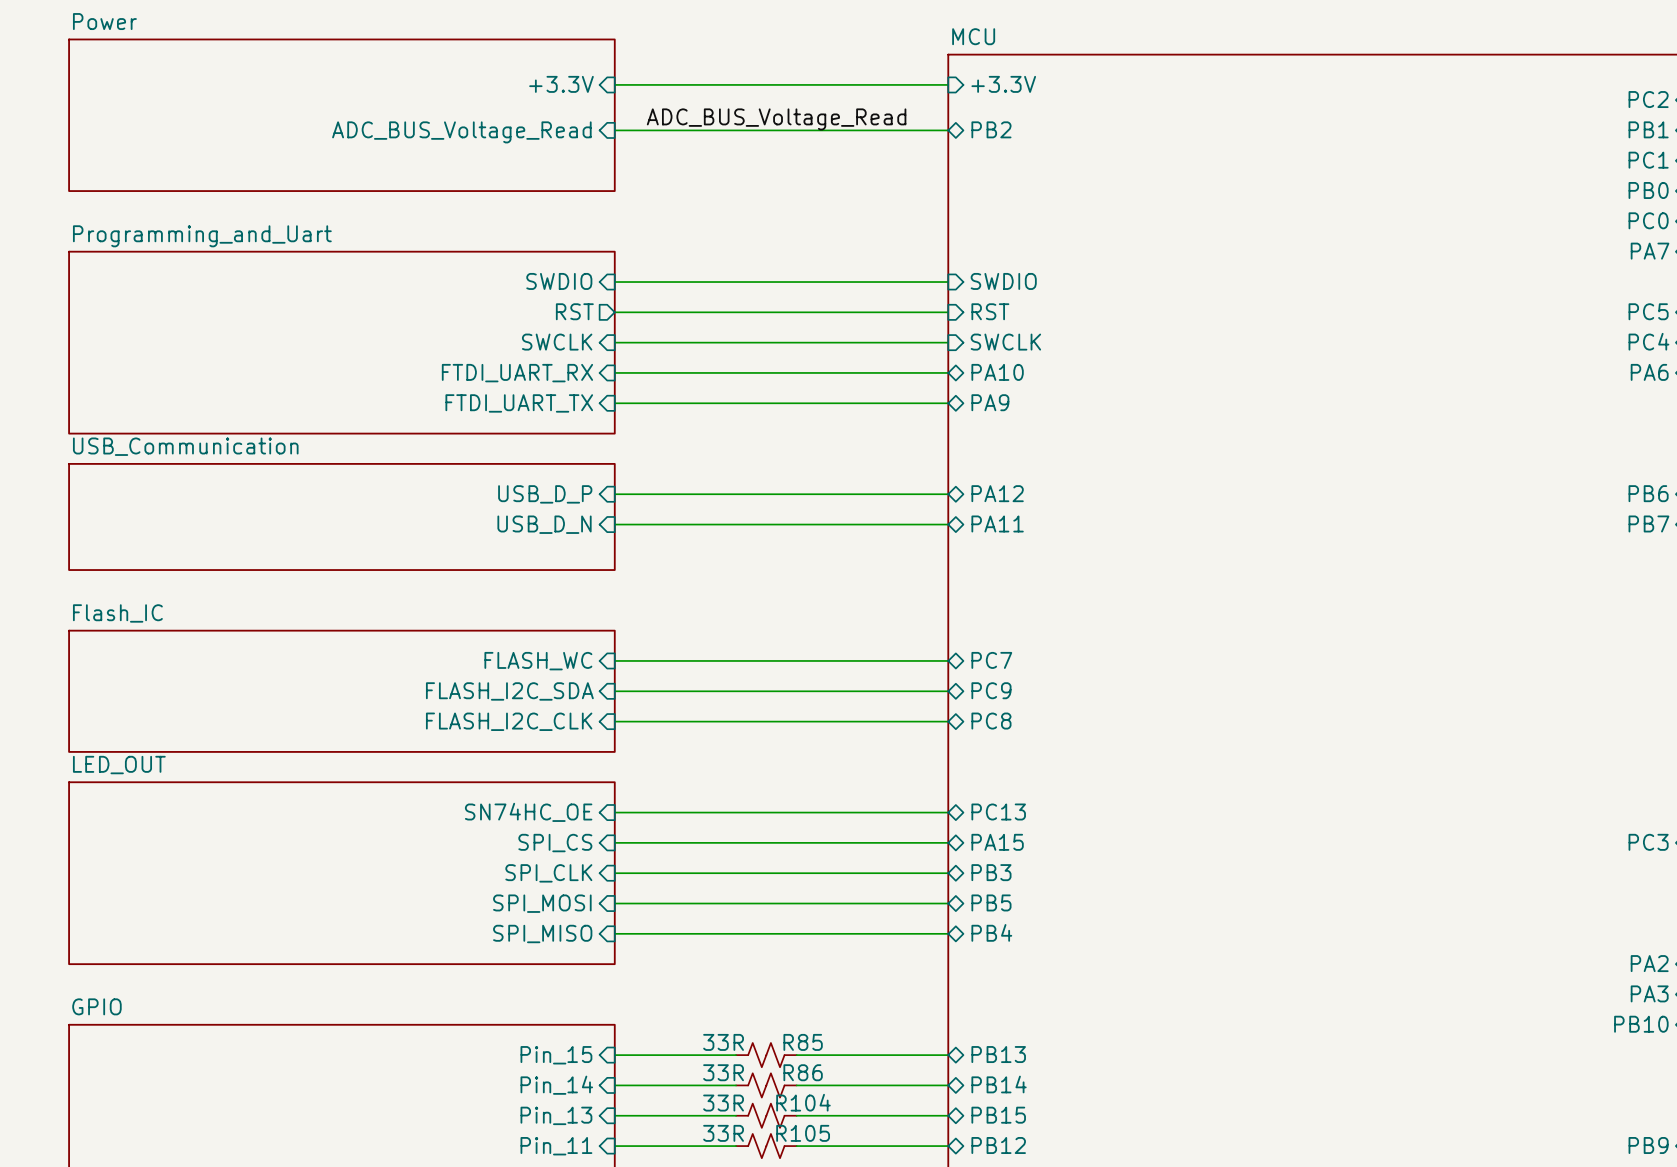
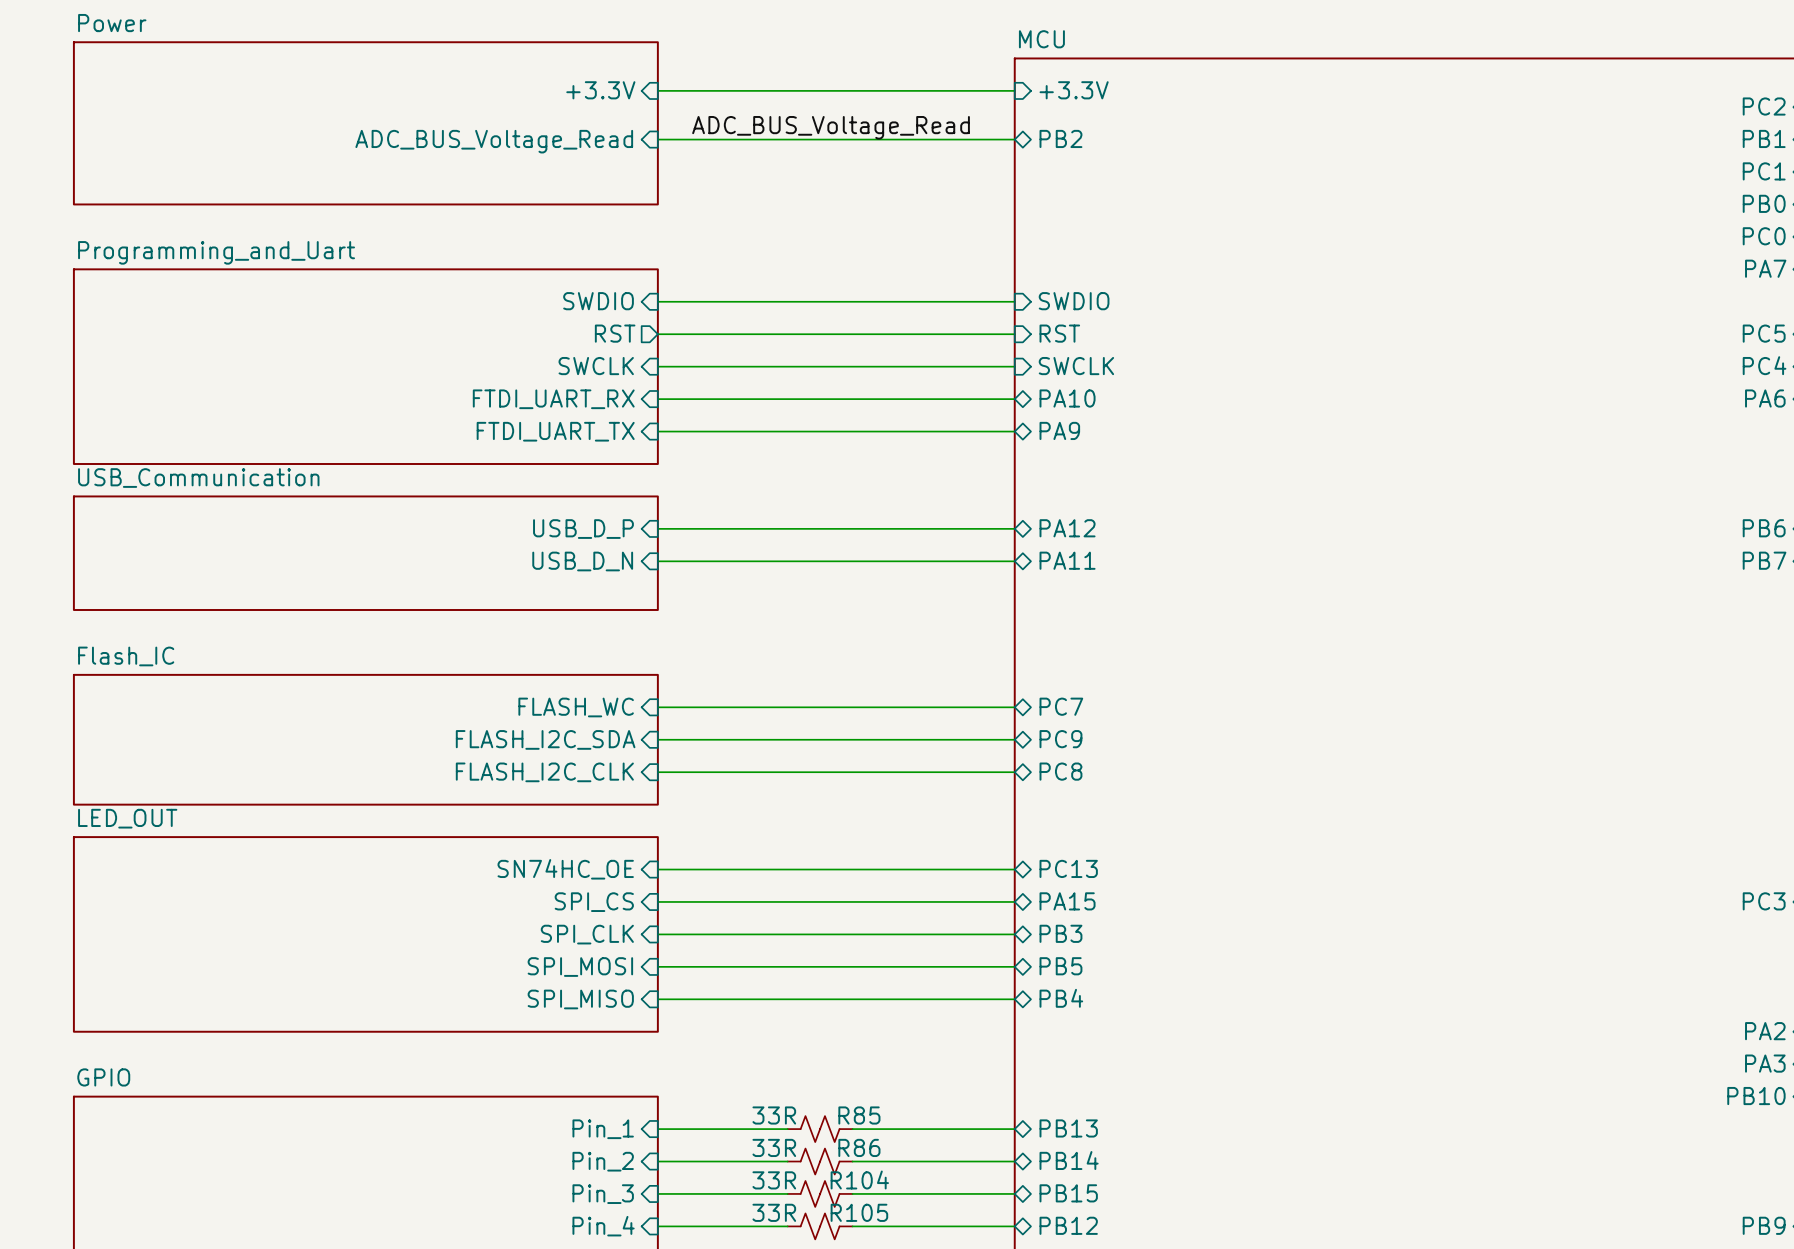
sheet pin: Pin_15 (556, 1055) -> Pin_1 (603, 1129)
sheet pin: Pin_14 (556, 1085) -> Pin_2 (603, 1161)
sheet pin: Pin_13 (556, 1115) -> Pin_3 (603, 1194)
sheet pin: Pin_11 (556, 1146) -> Pin_4 (603, 1226)

